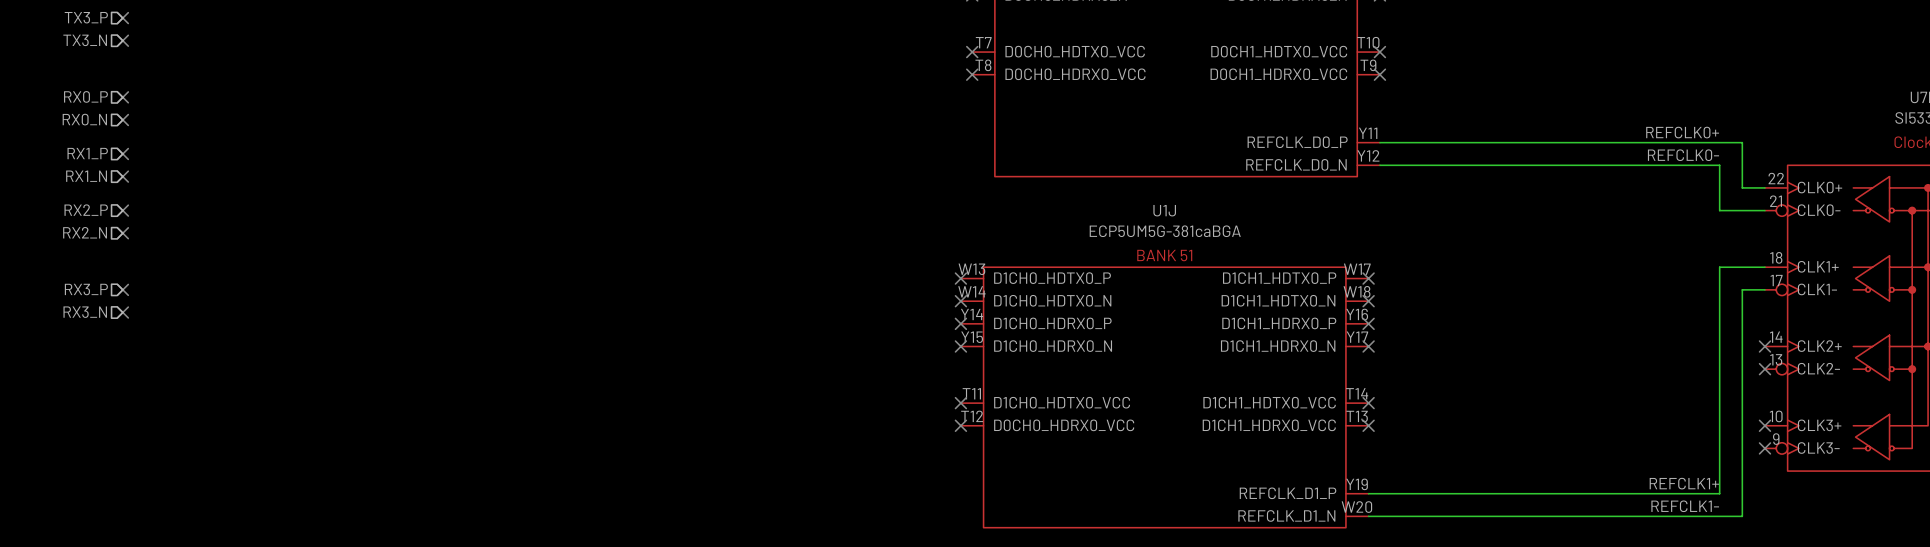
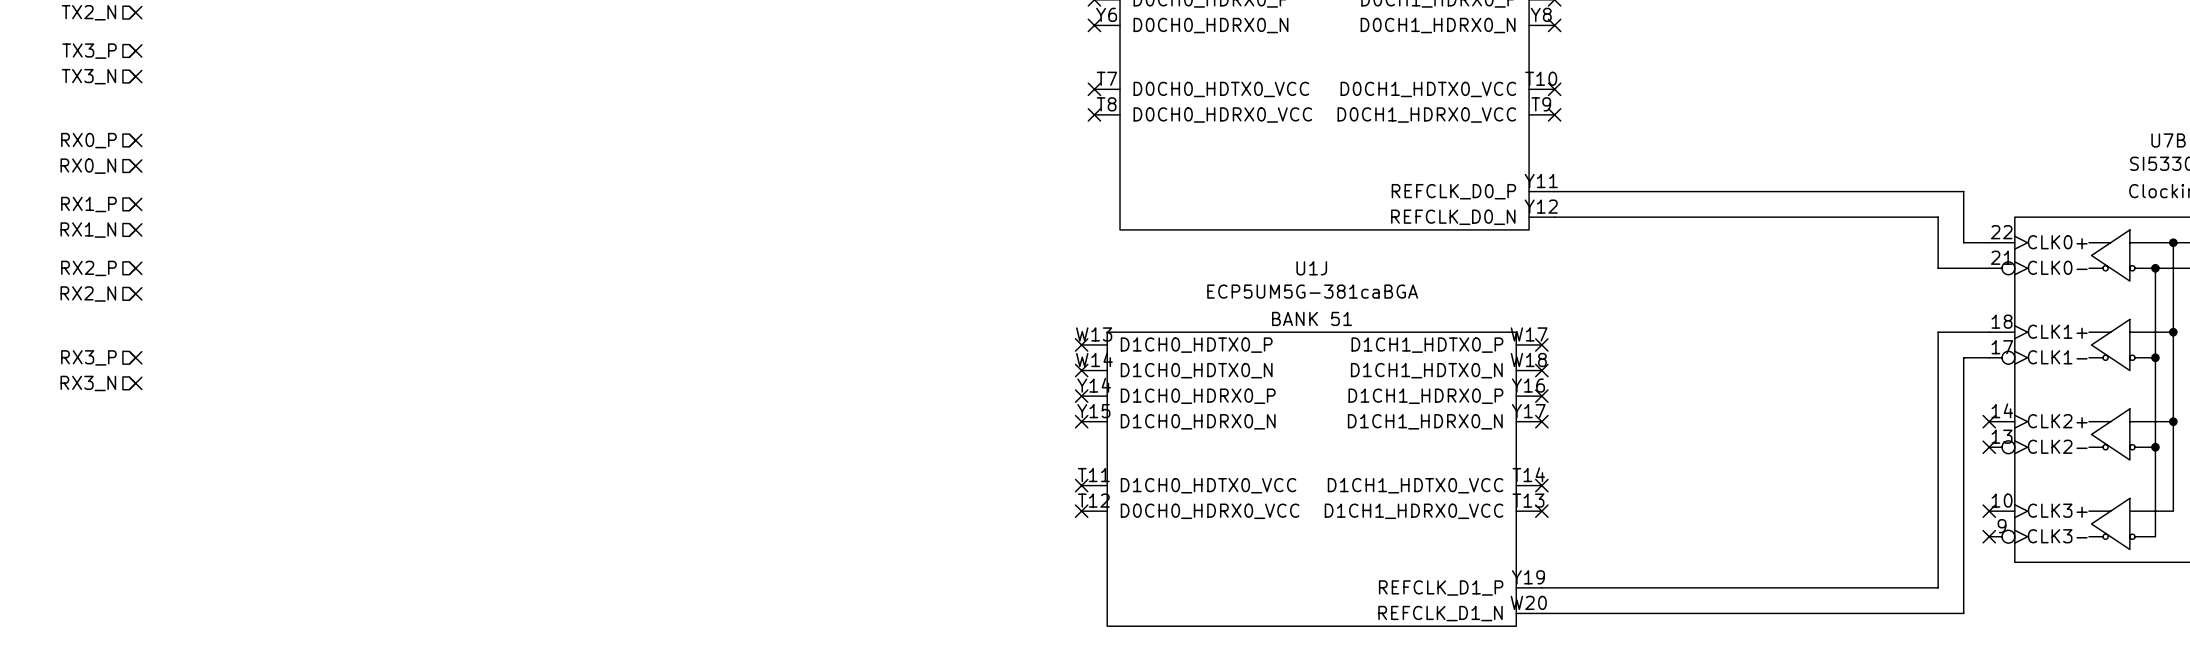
label: REFCLK0+ (1682, 132) -> none
label: REFCLK0- (1683, 155) -> none
label: REFCLK1+ (1684, 483) -> none
label: REFCLK1- (1685, 506) -> none

